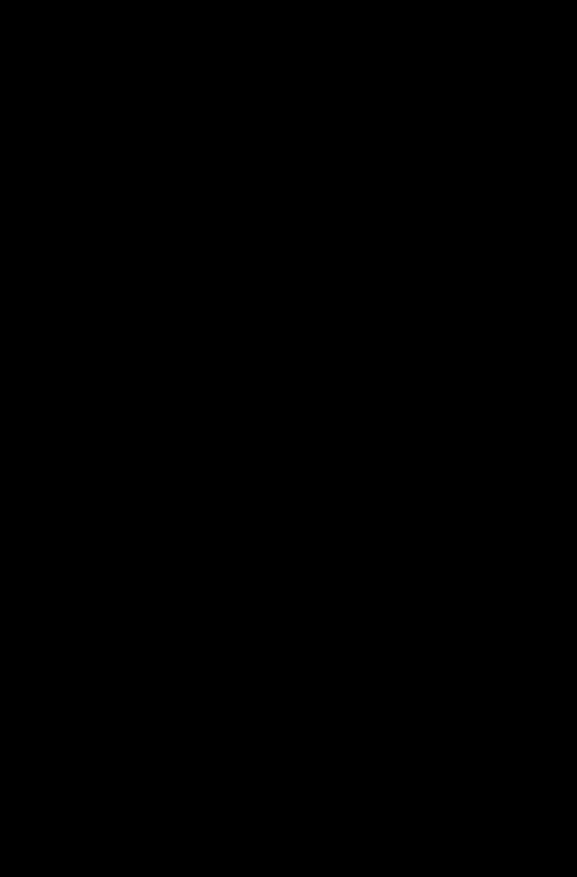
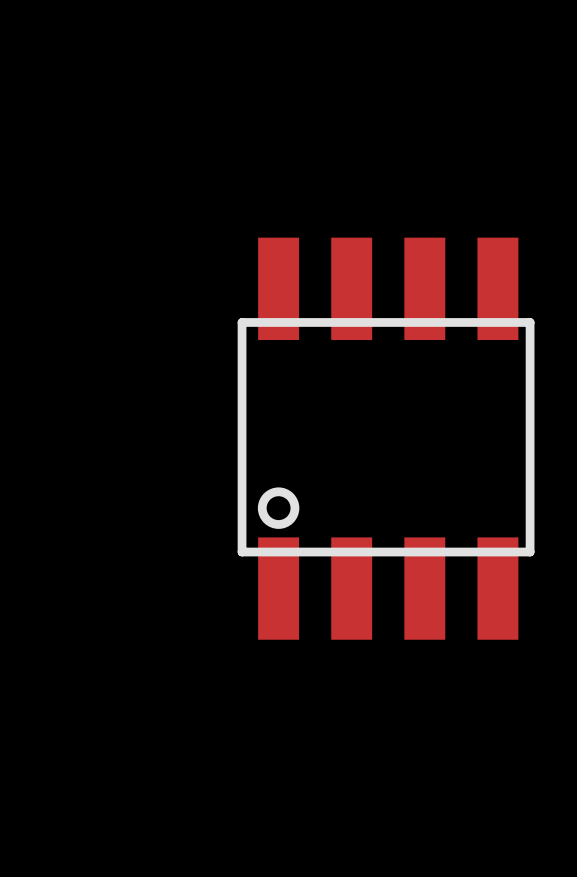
part: none -> (386, 438)

